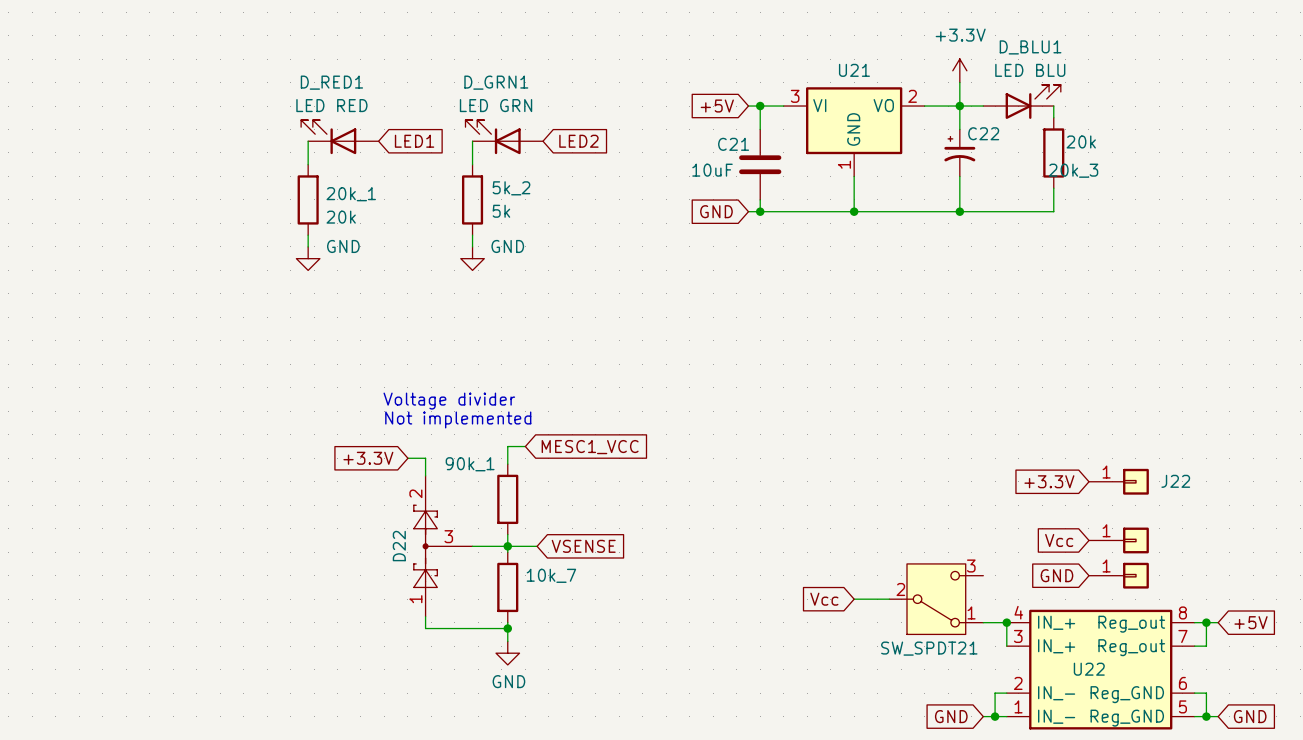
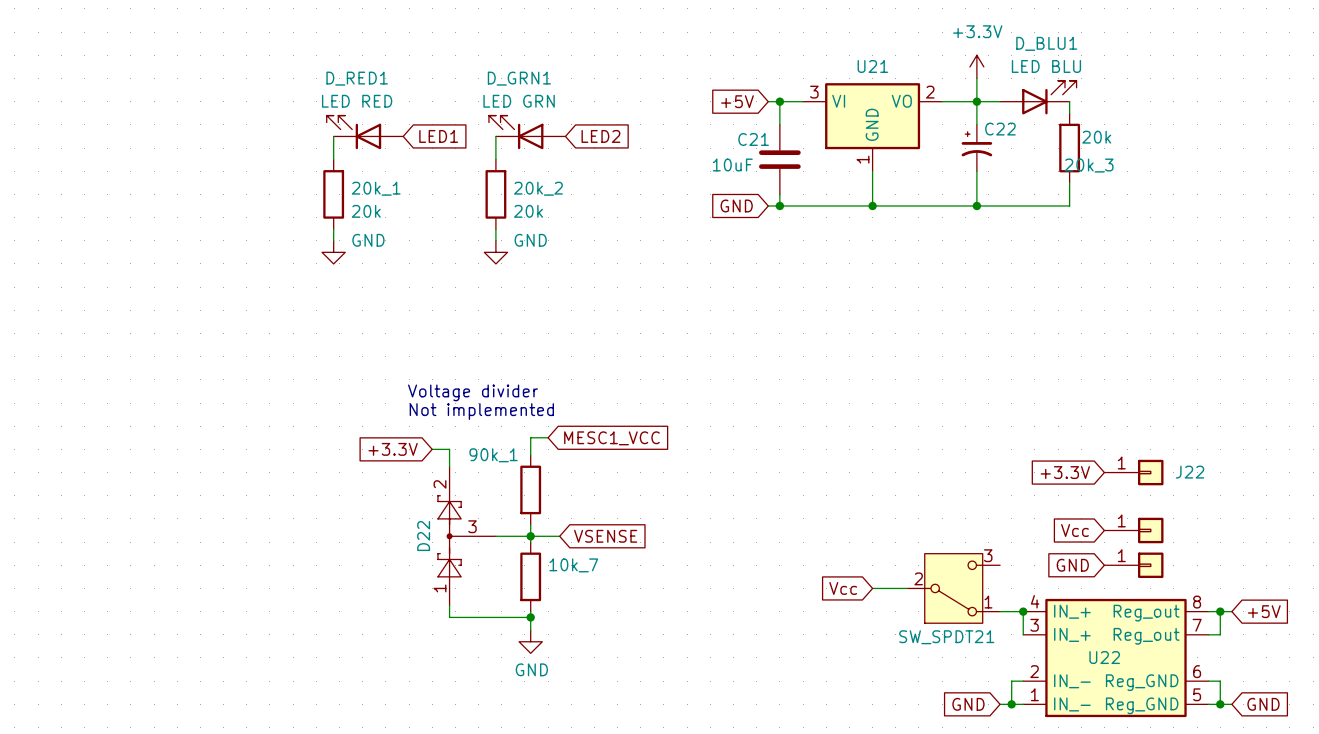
5k_2 name: 5k_2 (511, 188) -> 20k_2 (538, 188)
5k_2 value: 5k (501, 211) -> 20k (528, 211)

